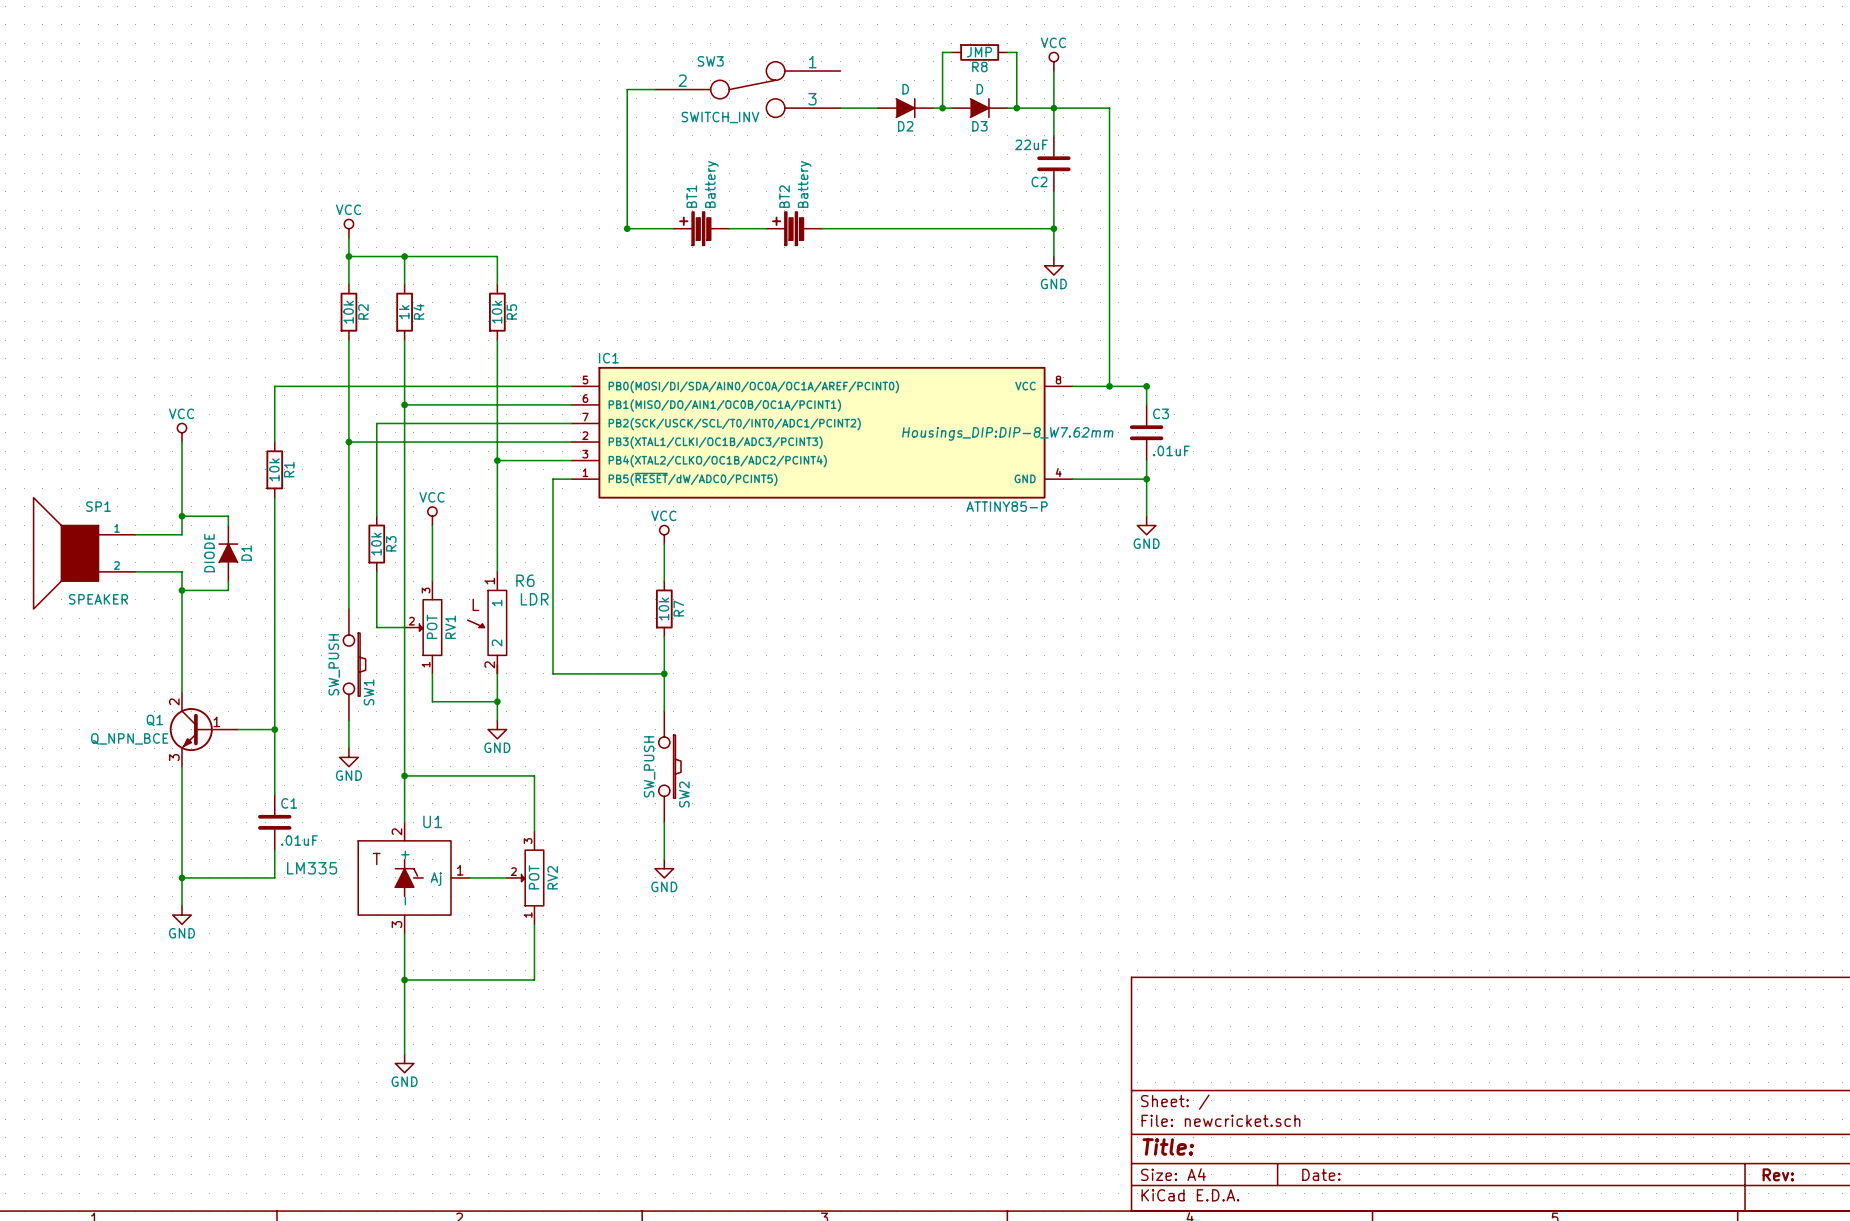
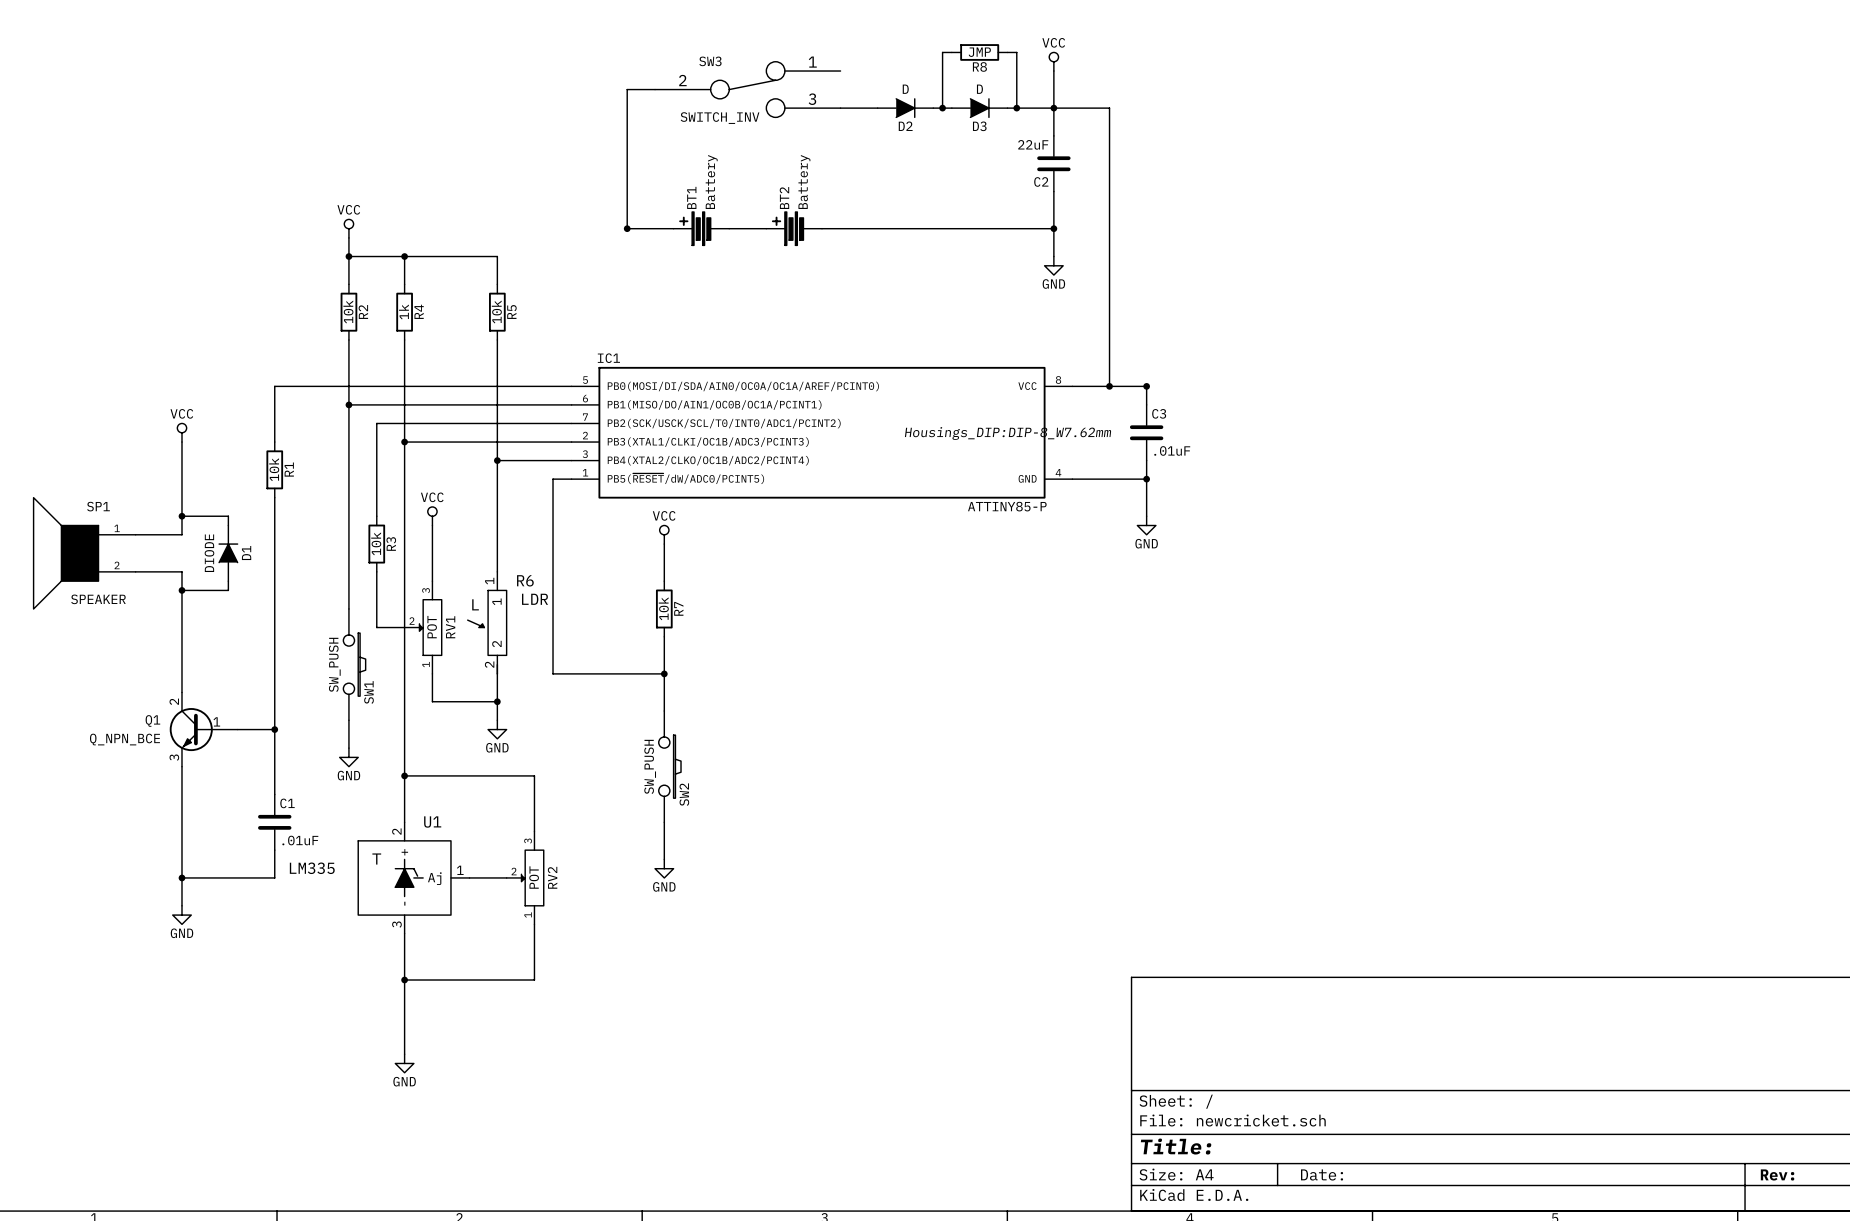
junction: none -> (348, 404)
junction: (404, 404) -> none
wire: (348, 442) (404, 442) -> (348, 404) (404, 404)
junction: (348, 442) -> none
junction: none -> (404, 442)

